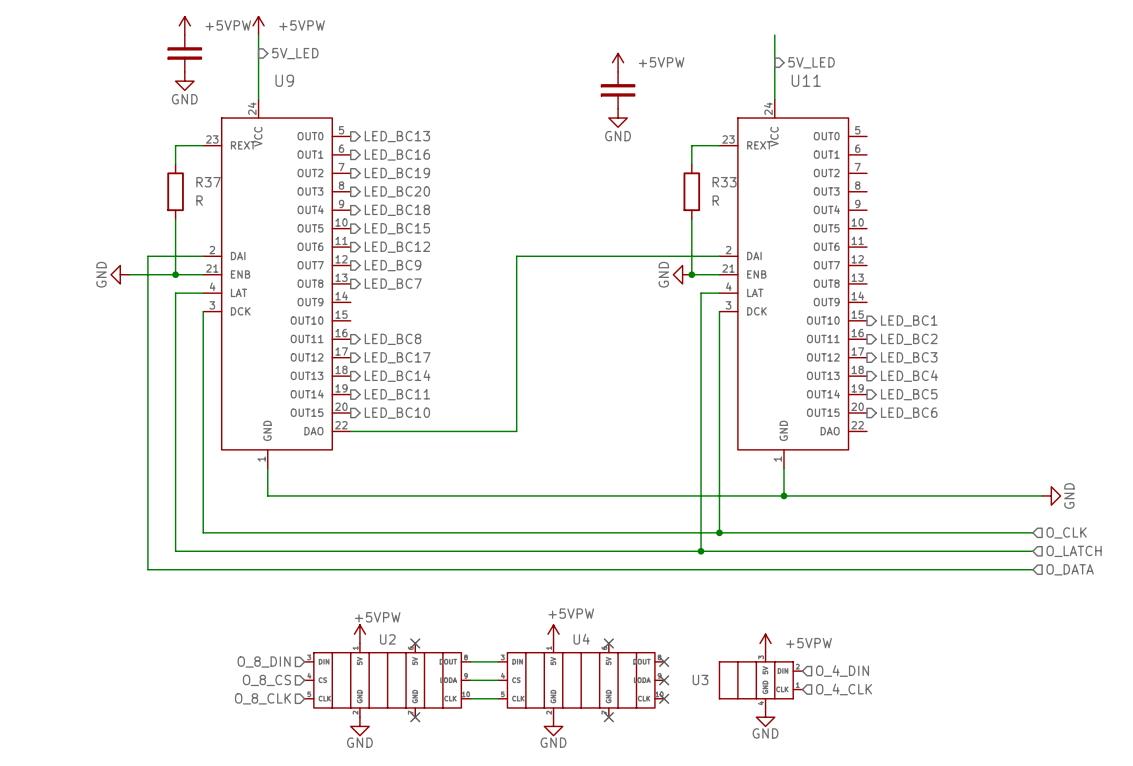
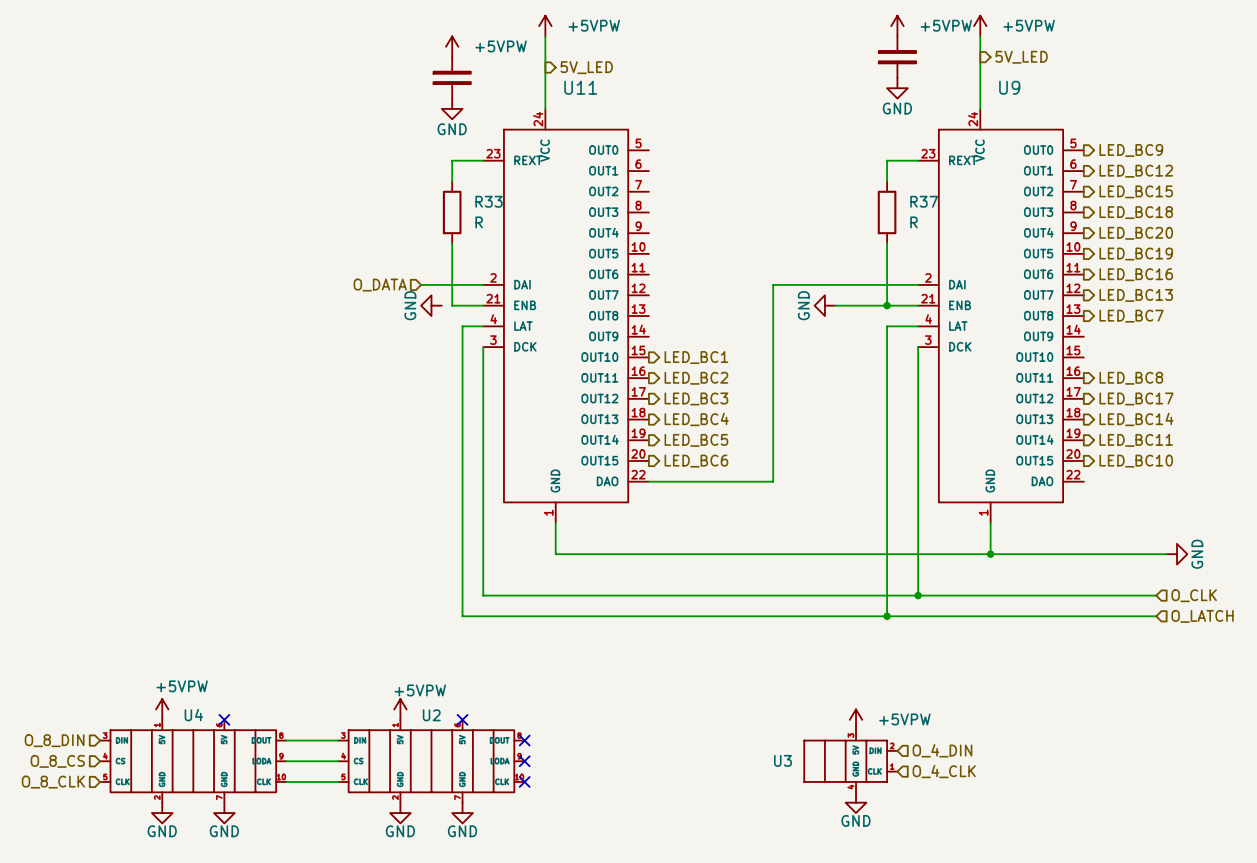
power symbol: +5VPW (184, 25) -> none
power symbol: +5VPW (258, 25) -> none
power symbol: none -> +5VPW (545, 26)
power symbol: none -> +5VPW (897, 26)
power symbol: none -> +5VPW (980, 26)
wire: (258, 35) (258, 99) -> none
wire: none -> (545, 36) (545, 108)
wire: (774, 35) (774, 99) -> (980, 36) (980, 108)
power symbol: none -> +5VPW (452, 46)
part: (184, 53) -> none
hierarchical label: 5V_LED (295, 53) -> none
part: none -> (897, 57)
hierarchical label: none -> 5V_LED (586, 67)
power symbol: +5VPW (618, 62) -> none
hierarchical label position: 5V_LED (811, 62) -> 5V_LED (1021, 57)
part: none -> (452, 77)
power symbol: GND (184, 81) -> none
power symbol: none -> GND (897, 88)
part: (618, 90) -> none
power symbol: none -> GND (452, 108)
power symbol: GND (618, 118) -> none
hierarchical label: LED_BC13 (397, 136) -> none
hierarchical label: none -> LED_BC9 (1131, 150)
wire: (203, 145) (175, 145) (175, 164) -> none
wire: none -> (483, 160) (452, 160) (452, 181)
wire: (719, 145) (691, 145) (691, 164) -> (918, 160) (887, 160) (887, 181)
hierarchical label: LED_BC16 (397, 154) -> none
hierarchical label: none -> LED_BC12 (1136, 171)
hierarchical label: LED_BC19 (397, 173) -> none
hierarchical label: none -> LED_BC15 (1136, 191)
R37 position: (175, 191) -> (887, 212)
hierarchical label: LED_BC20 (397, 191) -> none
R33 position: (691, 191) -> (452, 212)
hierarchical label: none -> LED_BC18 (1136, 212)
hierarchical label: LED_BC18 (397, 210) -> none
hierarchical label: none -> LED_BC20 (1136, 233)
wire: (175, 219) (175, 274) -> none
wire: none -> (452, 243) (452, 305) (483, 305)
wire: (691, 219) (691, 256) (516, 256) (516, 431) (350, 431) -> none
wire: none -> (887, 243) (887, 305)
hierarchical label: LED_BC15 (397, 228) -> none
hierarchical label: none -> LED_BC19 (1136, 254)
hierarchical label: LED_BC12 (397, 247) -> none
hierarchical label: none -> LED_BC16 (1136, 274)
wire: (203, 256) (147, 256) (147, 569) (1032, 569) -> none
hierarchical label: none -> O_DATA (380, 285)
wire: none -> (421, 284) (483, 284)
wire: none -> (804, 284) (918, 284)
hierarchical label: LED_BC9 (393, 265) -> none
hierarchical label: none -> LED_BC13 (1136, 295)
power symbol: GND (120, 274) -> none
wire: (129, 274) (203, 274) -> none
junction: (175, 274) -> none
power symbol: none -> GND (431, 305)
power symbol position: GND (682, 274) -> GND (824, 305)
wire: (691, 274) (719, 274) -> (773, 305) (773, 481) (648, 481)
junction: (691, 274) -> none
wire: none -> (835, 305) (918, 305)
junction: none -> (887, 305)
U9 position: (276, 283) -> (1000, 316)
U11 position: (793, 283) -> (566, 316)
hierarchical label: LED_BC7 (393, 284) -> none
hierarchical label: none -> LED_BC7 (1131, 316)
wire: (203, 293) (175, 293) (175, 551) (415, 551) -> (483, 326) (462, 326) (462, 616)
wire: (719, 293) (701, 293) (701, 551) -> none
wire: none -> (918, 326) (887, 326) (887, 616)
wire: (203, 311) (203, 532) (433, 532) -> (483, 347) (483, 595)
wire: (719, 311) (719, 532) -> (918, 347) (918, 595)
hierarchical label: none -> LED_BC1 (696, 357)
hierarchical label: LED_BC1 (909, 320) -> none
hierarchical label: LED_BC8 (393, 339) -> none
hierarchical label: none -> LED_BC2 (696, 378)
hierarchical label: LED_BC2 (909, 339) -> none
hierarchical label: none -> LED_BC8 (1131, 378)
hierarchical label: LED_BC17 (397, 357) -> none
hierarchical label: none -> LED_BC3 (696, 398)
hierarchical label: LED_BC3 (909, 357) -> none
hierarchical label: none -> LED_BC17 (1136, 398)
hierarchical label: LED_BC14 (397, 376) -> none
hierarchical label: none -> LED_BC4 (696, 419)
hierarchical label: LED_BC4 (909, 376) -> none
hierarchical label: none -> LED_BC14 (1136, 419)
hierarchical label: LED_BC11 (397, 394) -> none
hierarchical label: none -> LED_BC5 (696, 440)
hierarchical label: LED_BC5 (909, 394) -> none
hierarchical label: none -> LED_BC11 (1136, 440)
hierarchical label: LED_BC10 (397, 413) -> none
hierarchical label: none -> LED_BC6 (696, 461)
hierarchical label: LED_BC6 (909, 413) -> none
hierarchical label: none -> LED_BC10 (1136, 461)
wire: (267, 468) (267, 495) (498, 495) -> (555, 523) (555, 554)
wire: (783, 468) (783, 495) -> (990, 523) (990, 554)
junction: (783, 495) -> none
junction: none -> (990, 554)
junction: (719, 532) -> none
junction: none -> (918, 595)
junction: (701, 551) -> none
junction: none -> (887, 616)
hierarchical label: O_DATA (1070, 569) -> none
power symbol: none -> +5VPW (162, 709)
power symbol: +5VPW (553, 634) -> none
no-connect mark: none -> (224, 719)
no-connect mark: (608, 643) -> none
hierarchical label: none -> O_8_DIN (54, 740)
wire: none -> (286, 740) (338, 740)
hierarchical label: O_8_DIN (264, 661) -> none
wire: (470, 661) (498, 661) -> none
no-connect mark: none -> (524, 740)
no-connect mark: (664, 661) -> none
hierarchical label: none -> O_8_CS (57, 761)
wire: none -> (286, 761) (338, 761)
hierarchical label: O_8_CS (266, 680) -> none
wire: (470, 680) (498, 680) -> none
no-connect mark: none -> (524, 761)
U4 position: (581, 680) -> (193, 761)
no-connect mark: (664, 680) -> none
hierarchical label: none -> O_8_CLK (53, 782)
wire: none -> (286, 781) (338, 781)
hierarchical label: O_8_CLK (263, 698) -> none
wire: (470, 698) (498, 698) -> none
no-connect mark: none -> (524, 781)
no-connect mark: (664, 698) -> none
no-connect mark: (415, 717) -> none
no-connect mark: (608, 717) -> none
power symbol: none -> GND (162, 813)
power symbol: none -> GND (224, 813)
power symbol position: GND (553, 726) -> GND (462, 813)

